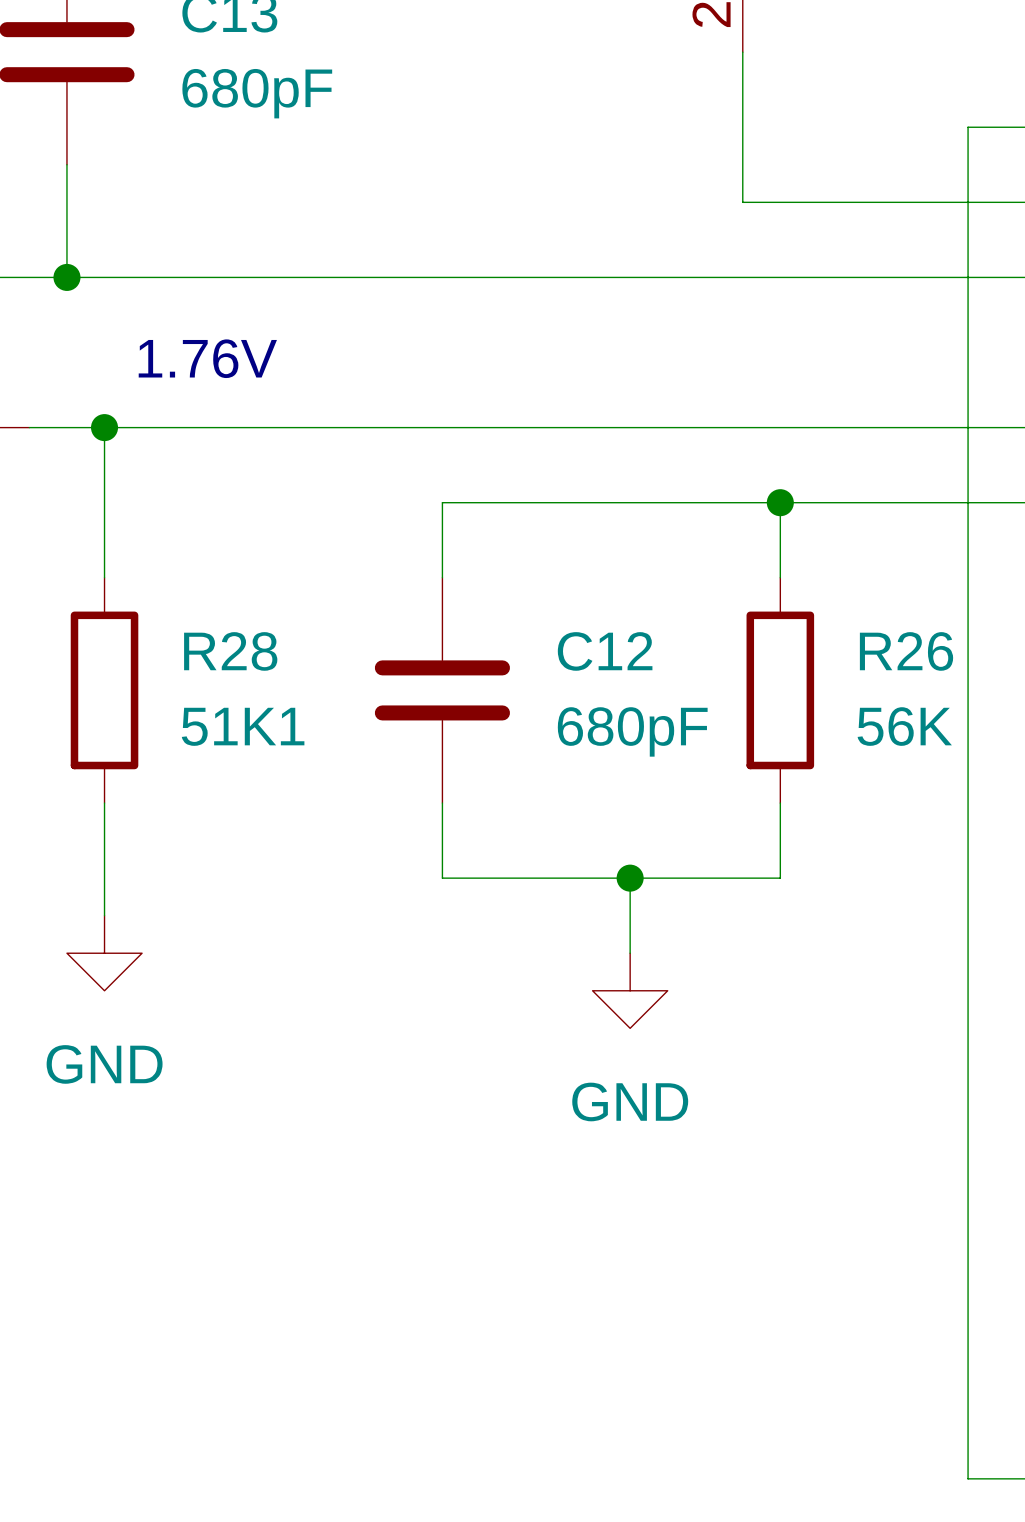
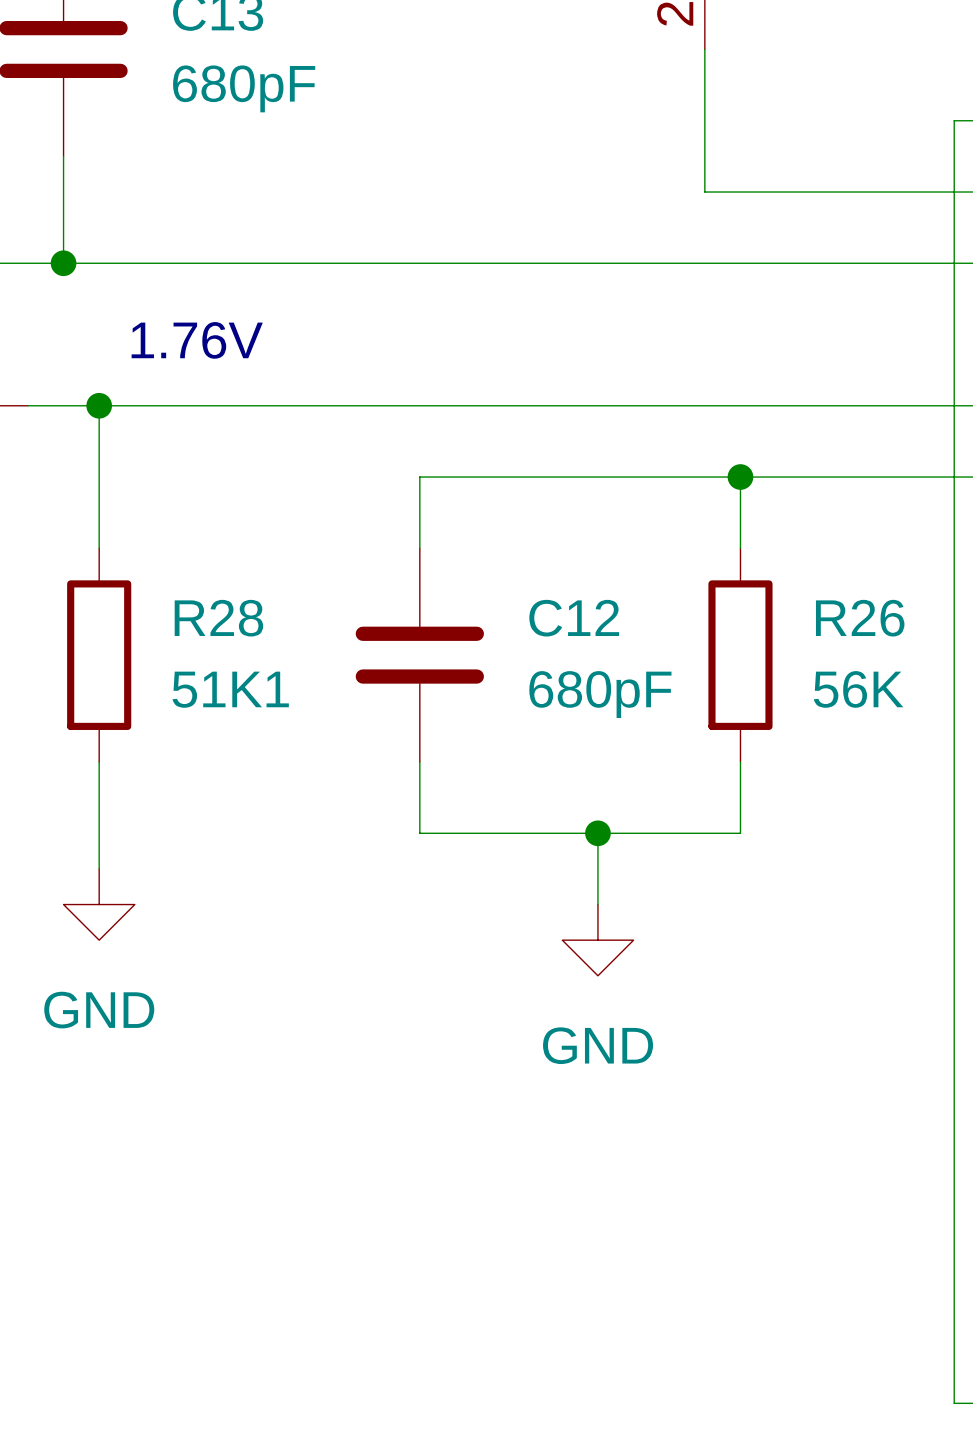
wire: (1005, 127) (968, 127) (968, 1478) (1005, 1478) -> (954, 120) (954, 1403)

